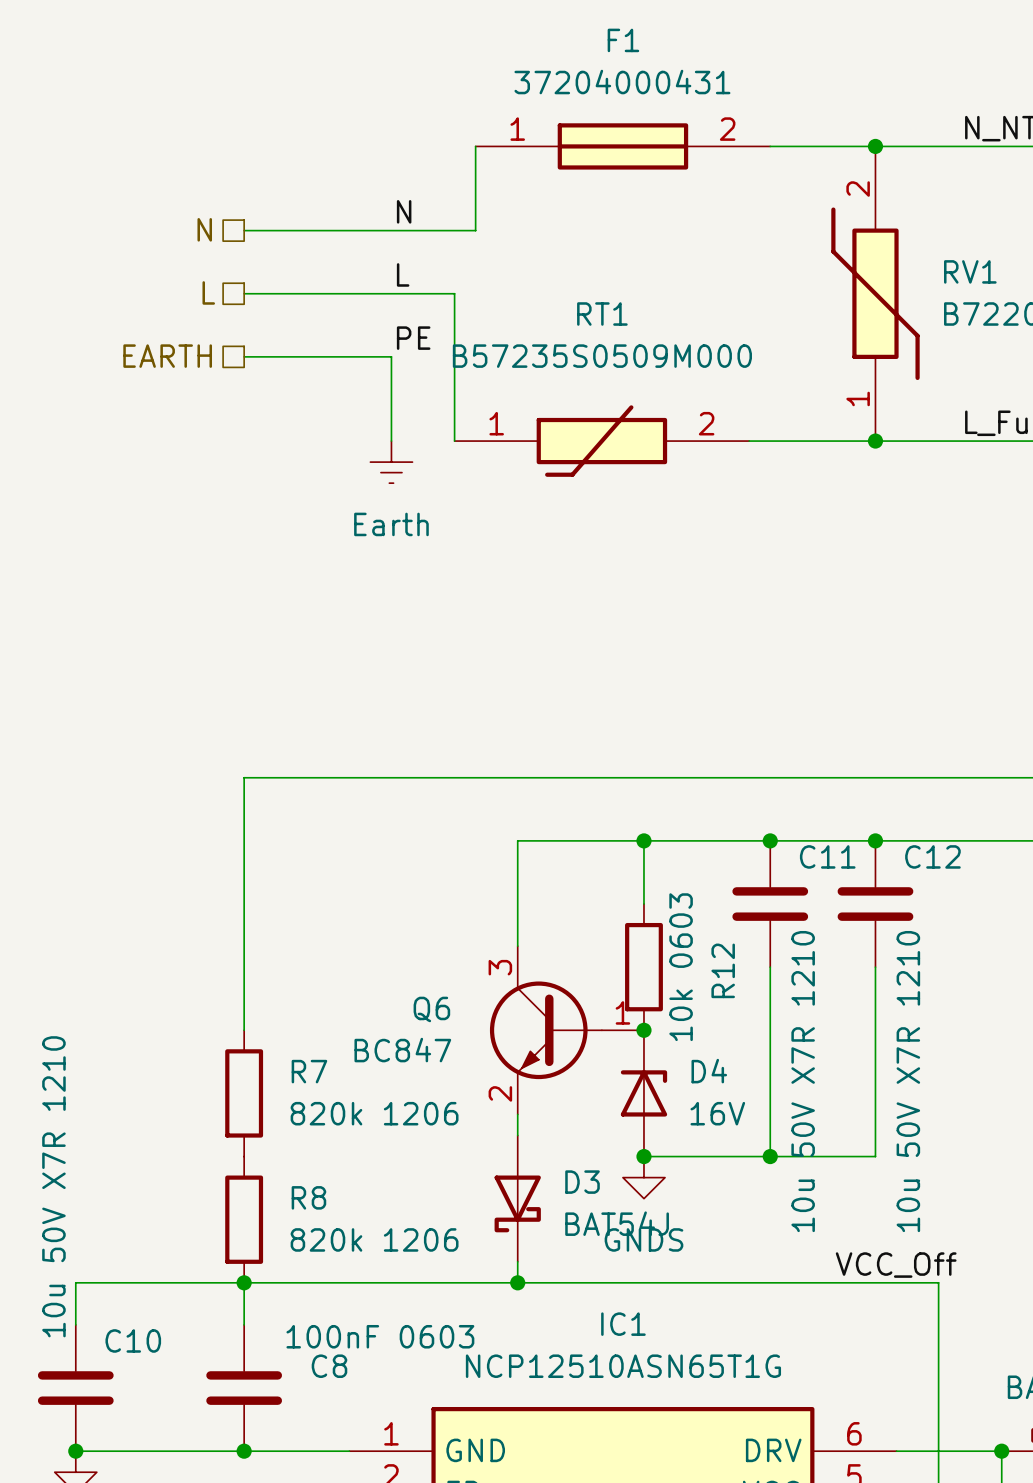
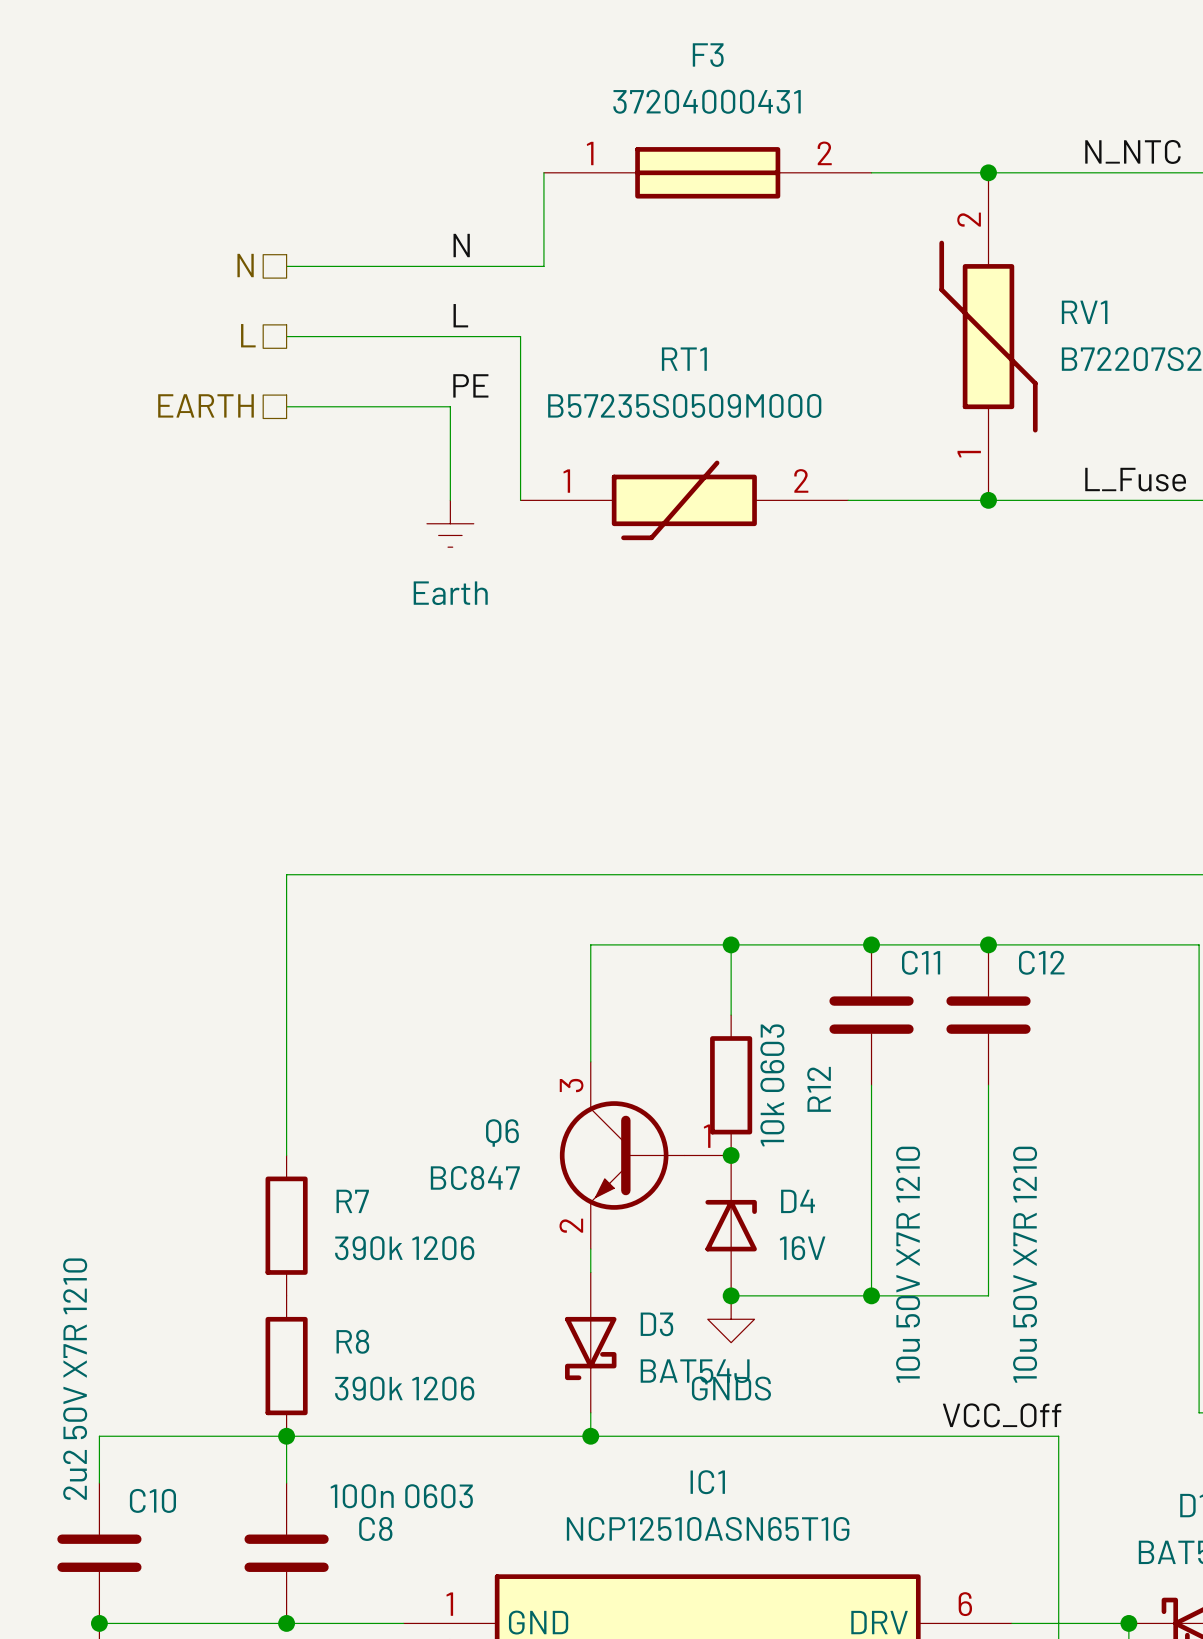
F1 name: F1 (623, 40) -> F3 (708, 55)
R7 value: 820k 1206 (374, 1113) -> 390k 1206 (404, 1248)
C10 value: 10u 50V X7R 1210 (53, 1186) -> 2u2 50V X7R 1210 (75, 1379)
R8 value: 820k 1206 (374, 1239) -> 390k 1206 (404, 1388)
C8 value: 100nF 0603 (380, 1336) -> 100n 0603 (401, 1496)

